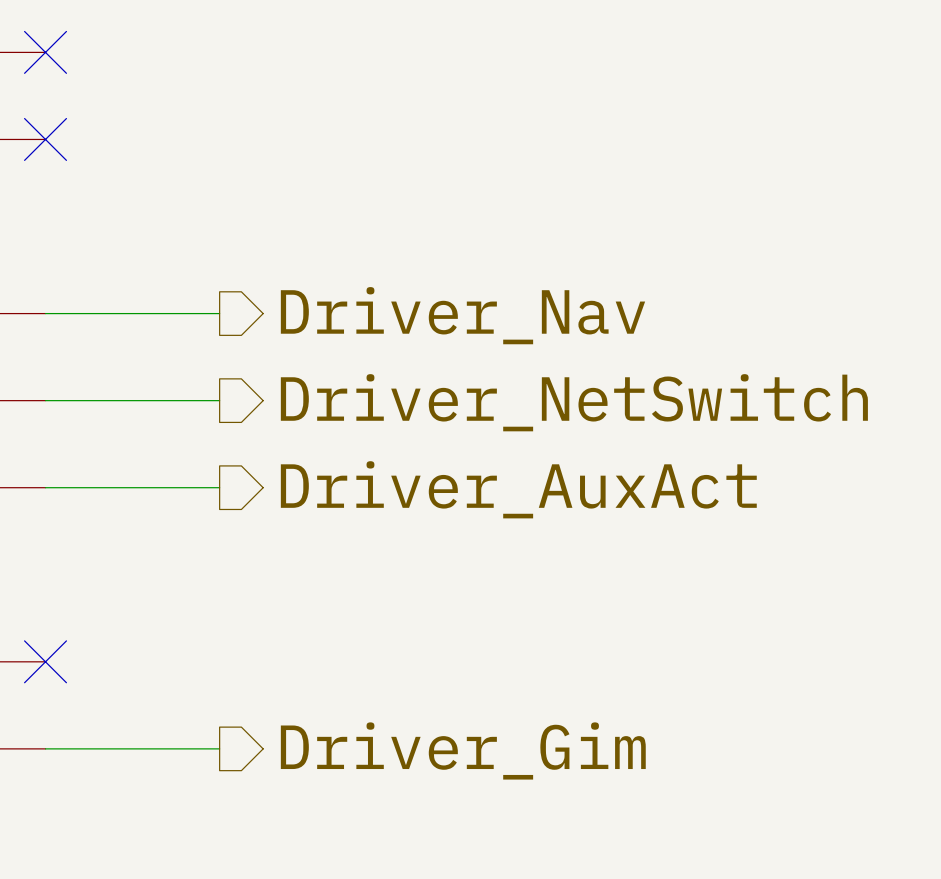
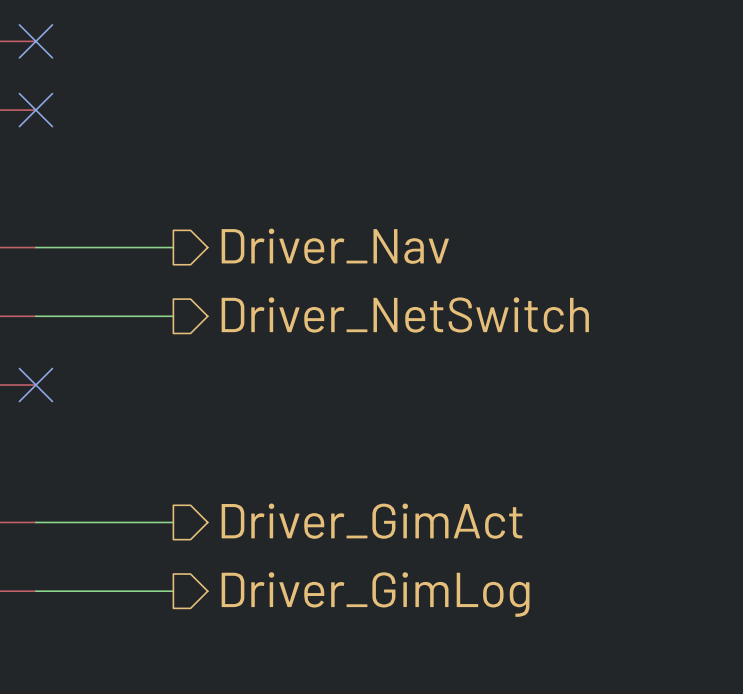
wire: (45, 487) (219, 487) -> (35, 522) (173, 522)
hierarchical label: Driver_AuxAct (518, 489) -> none
no-connect mark position: (45, 661) -> (35, 385)
hierarchical label: none -> Driver_GimAct (372, 521)
hierarchical label: Driver_Gim (463, 750) -> Driver_GimLog (375, 594)

